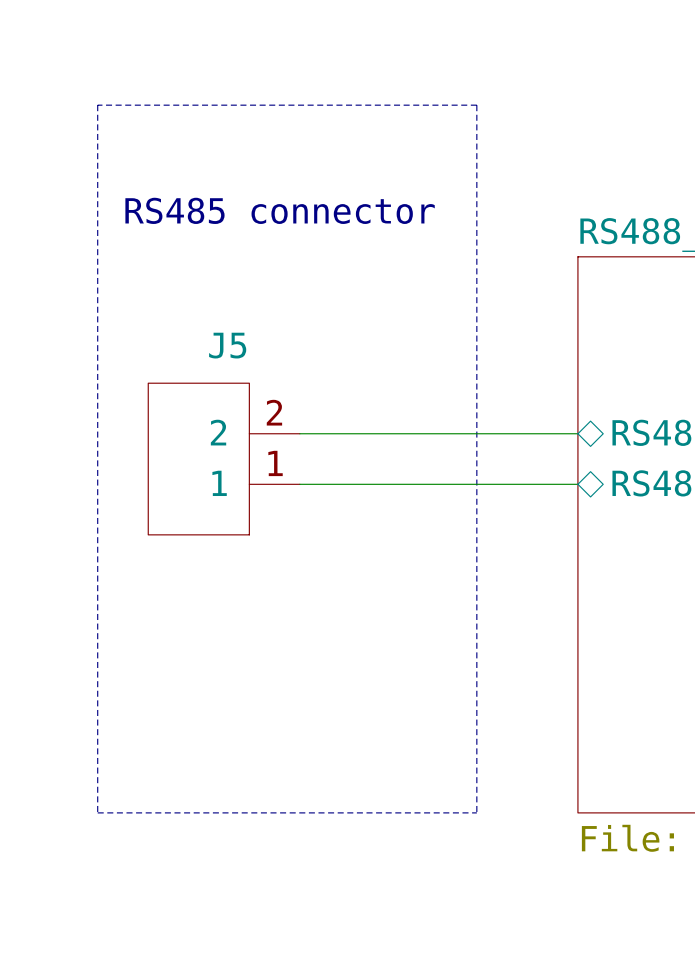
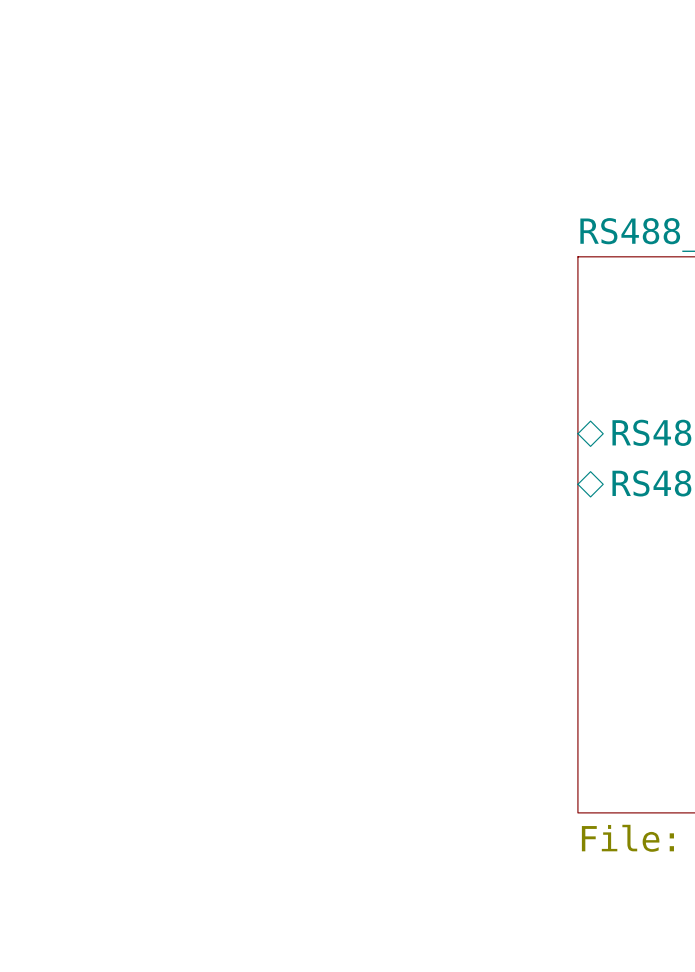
line: (97, 105) (476, 105) (476, 812) (97, 812) (97, 105) -> none
text: RS485 connector (280, 210) -> none
wire: (299, 433) (577, 433) -> none
J5: (224, 459) -> none
wire: (299, 484) (577, 484) -> none

